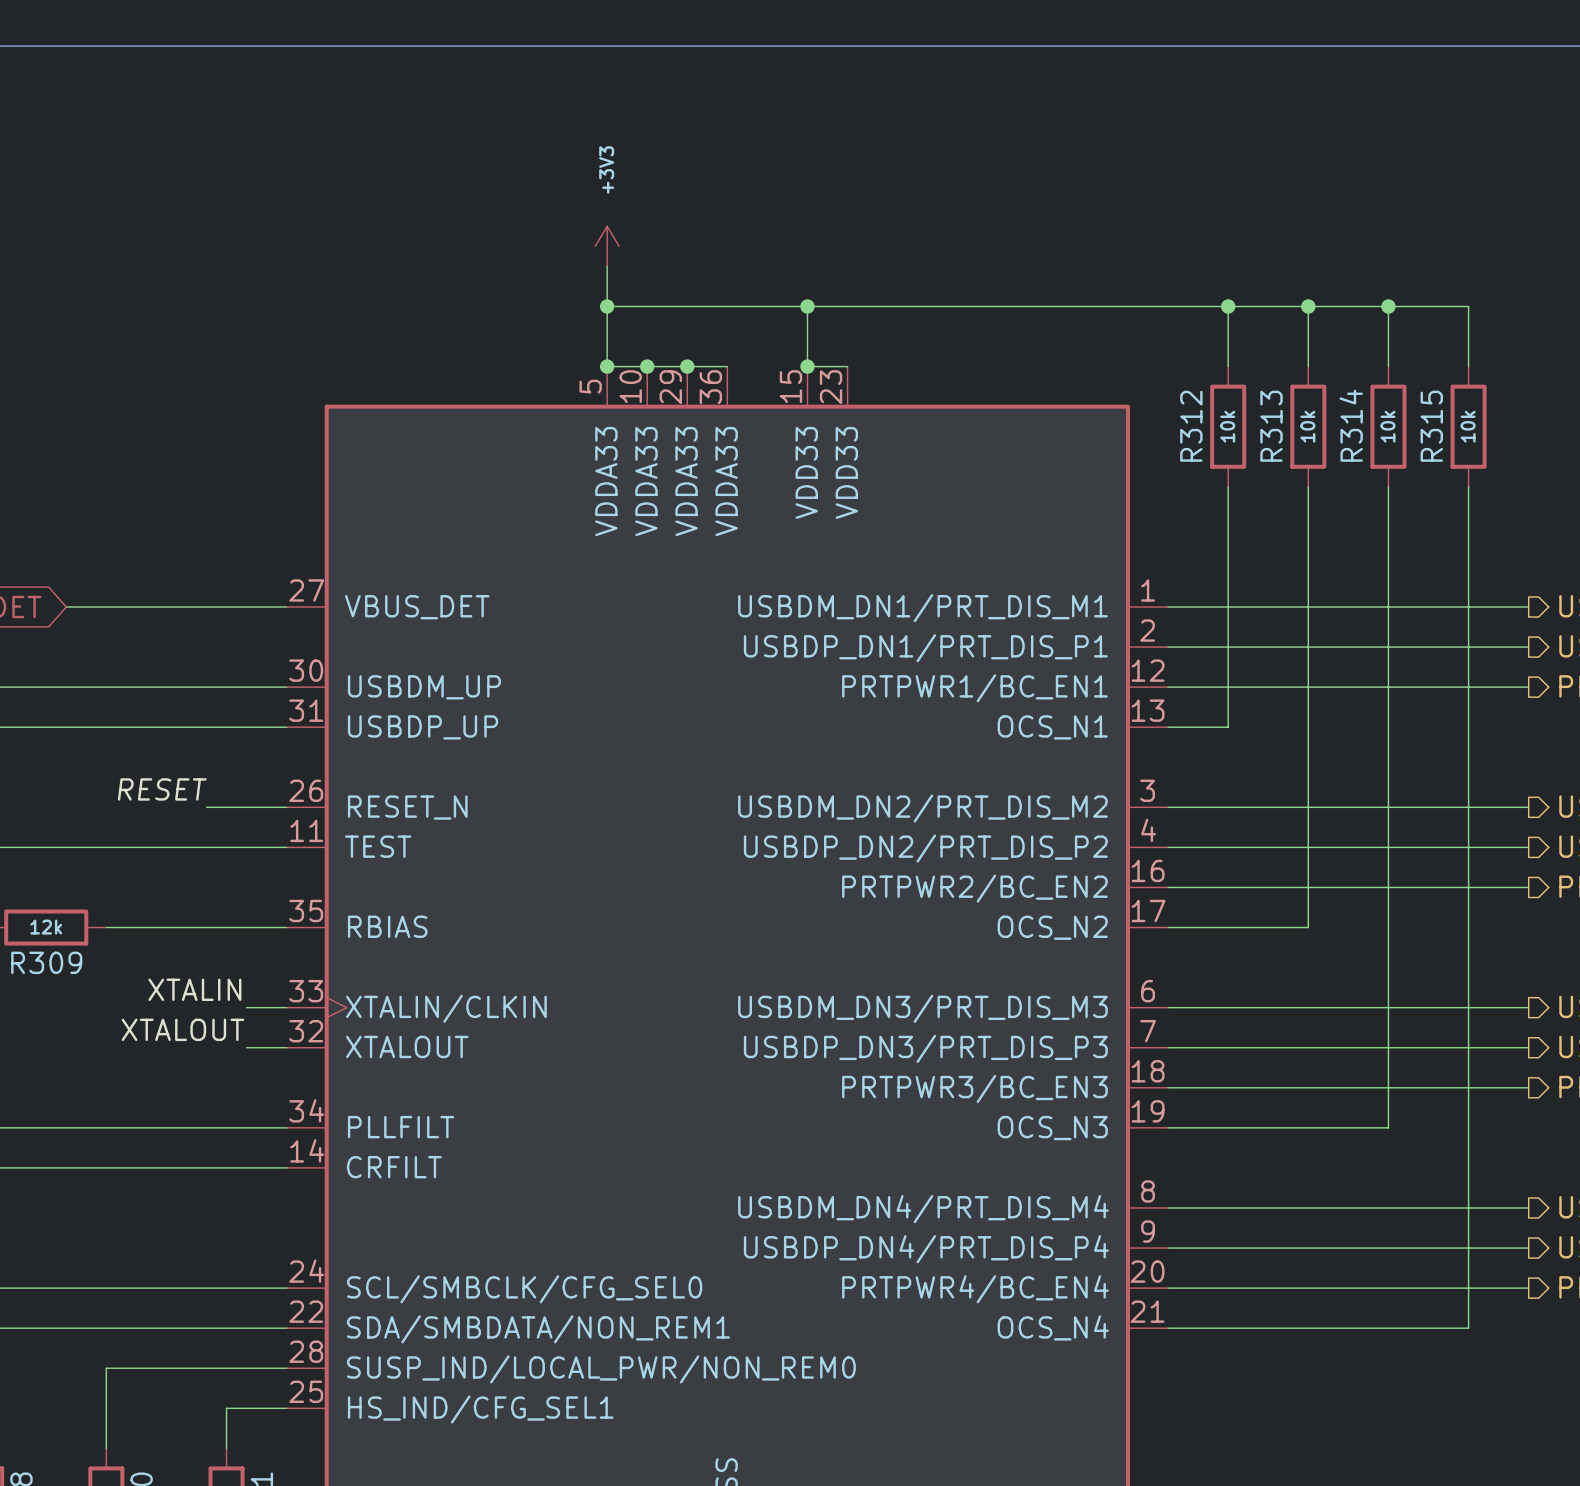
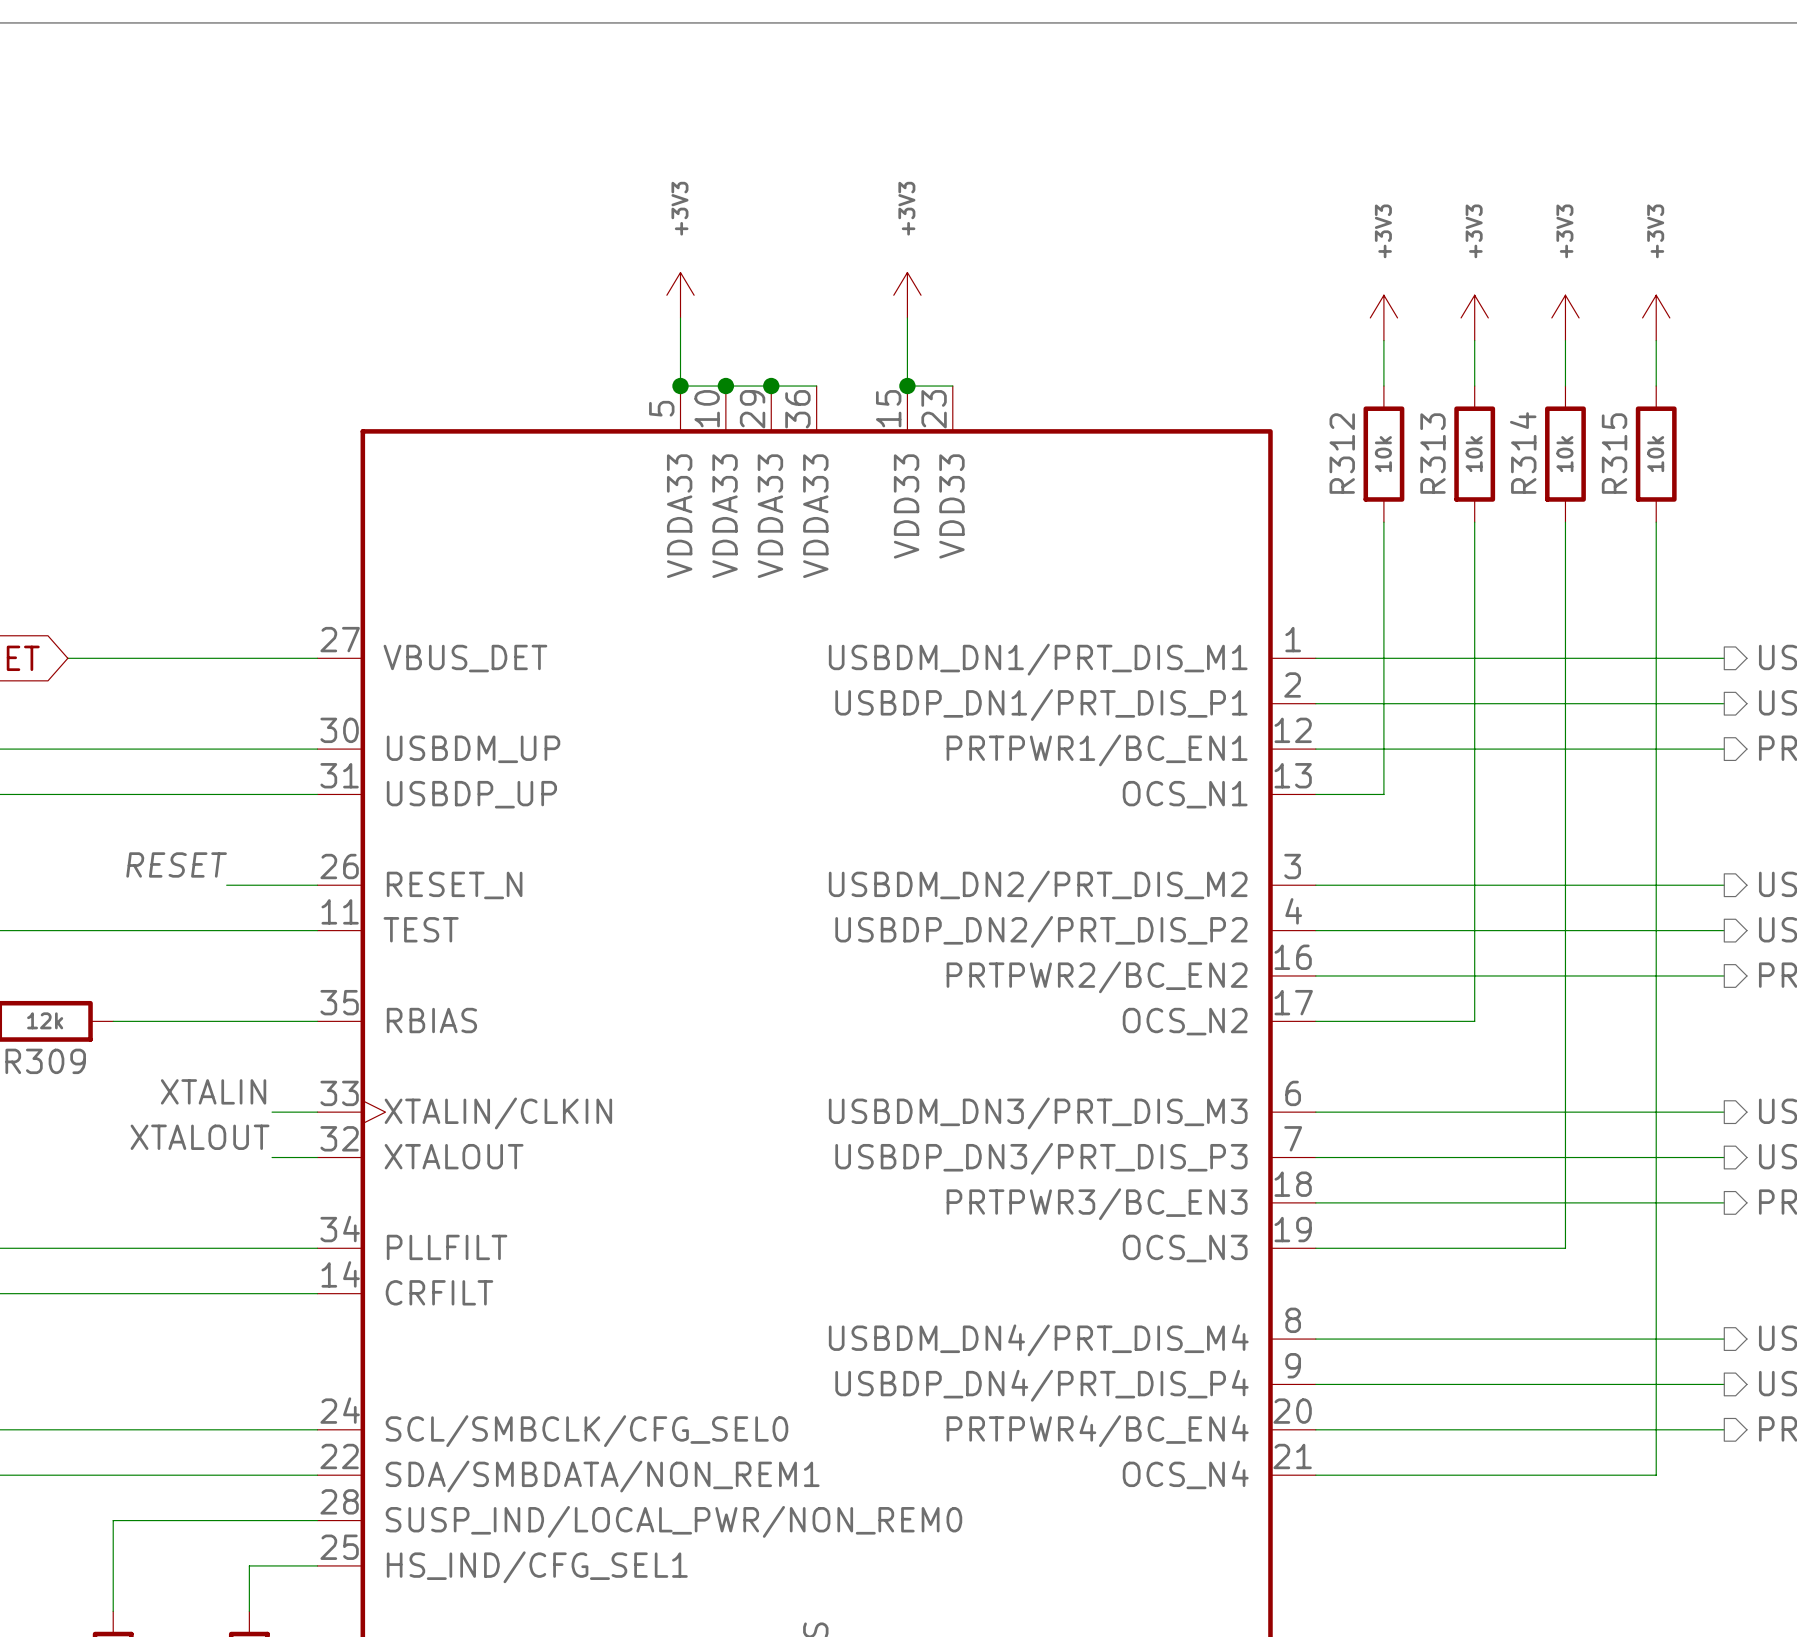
power symbol position: +3V3 (607, 246) -> +3V3 (680, 295)
wire: (607, 266) (607, 306) (1468, 306) (1468, 326) -> none
power symbol: none -> +3V3 (907, 295)
junction: (607, 306) -> none
junction: (807, 306) -> none
junction: (1228, 306) -> none
power symbol: none -> +3V3 (1383, 317)
junction: (1308, 306) -> none
power symbol: none -> +3V3 (1474, 317)
junction: (1388, 306) -> none
power symbol: none -> +3V3 (1565, 317)
power symbol: none -> +3V3 (1656, 317)

